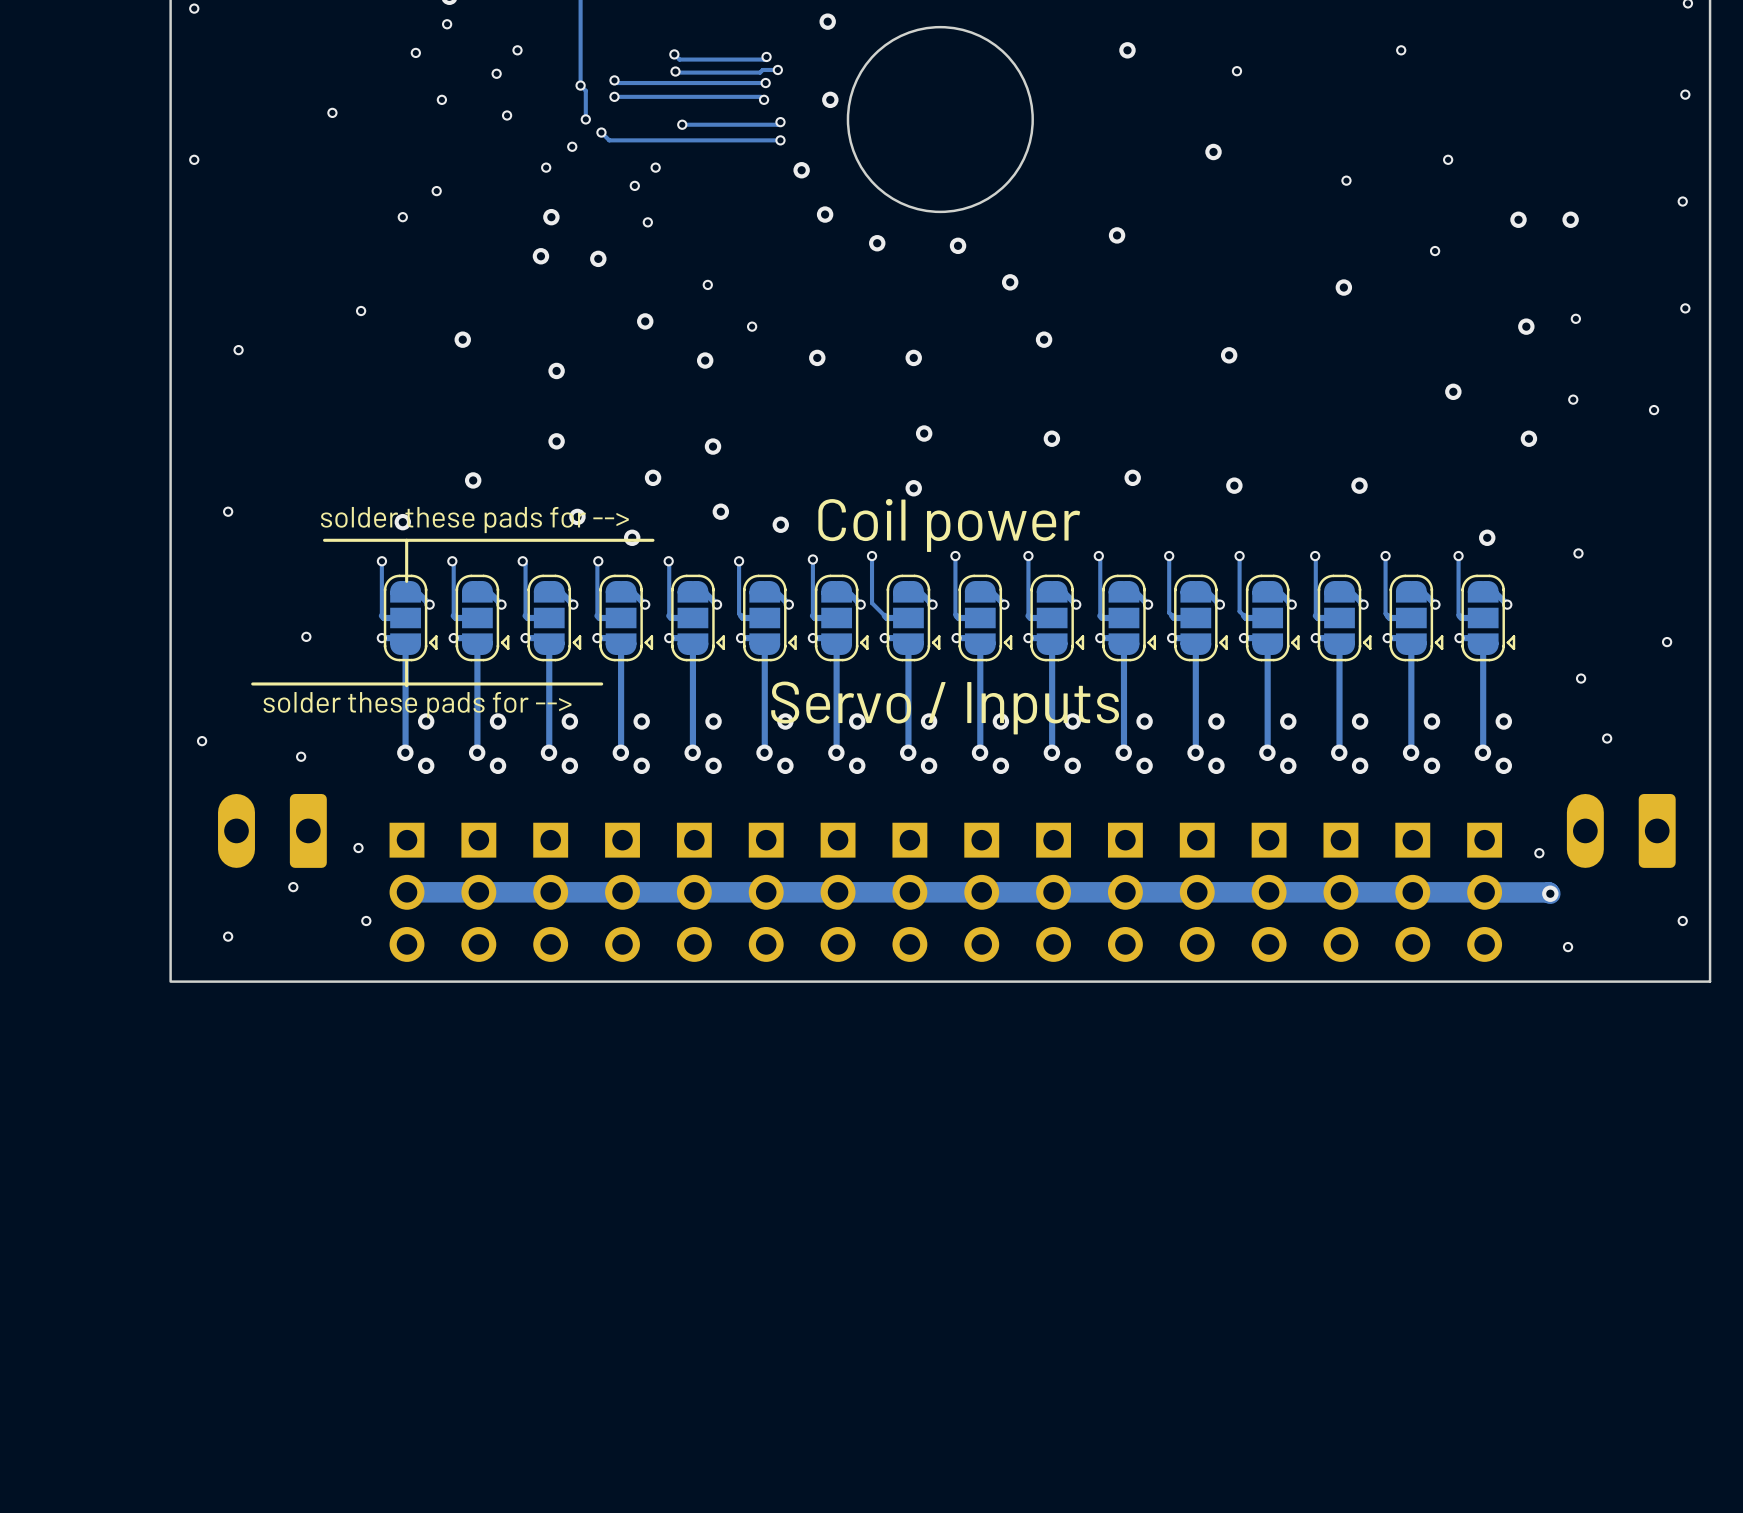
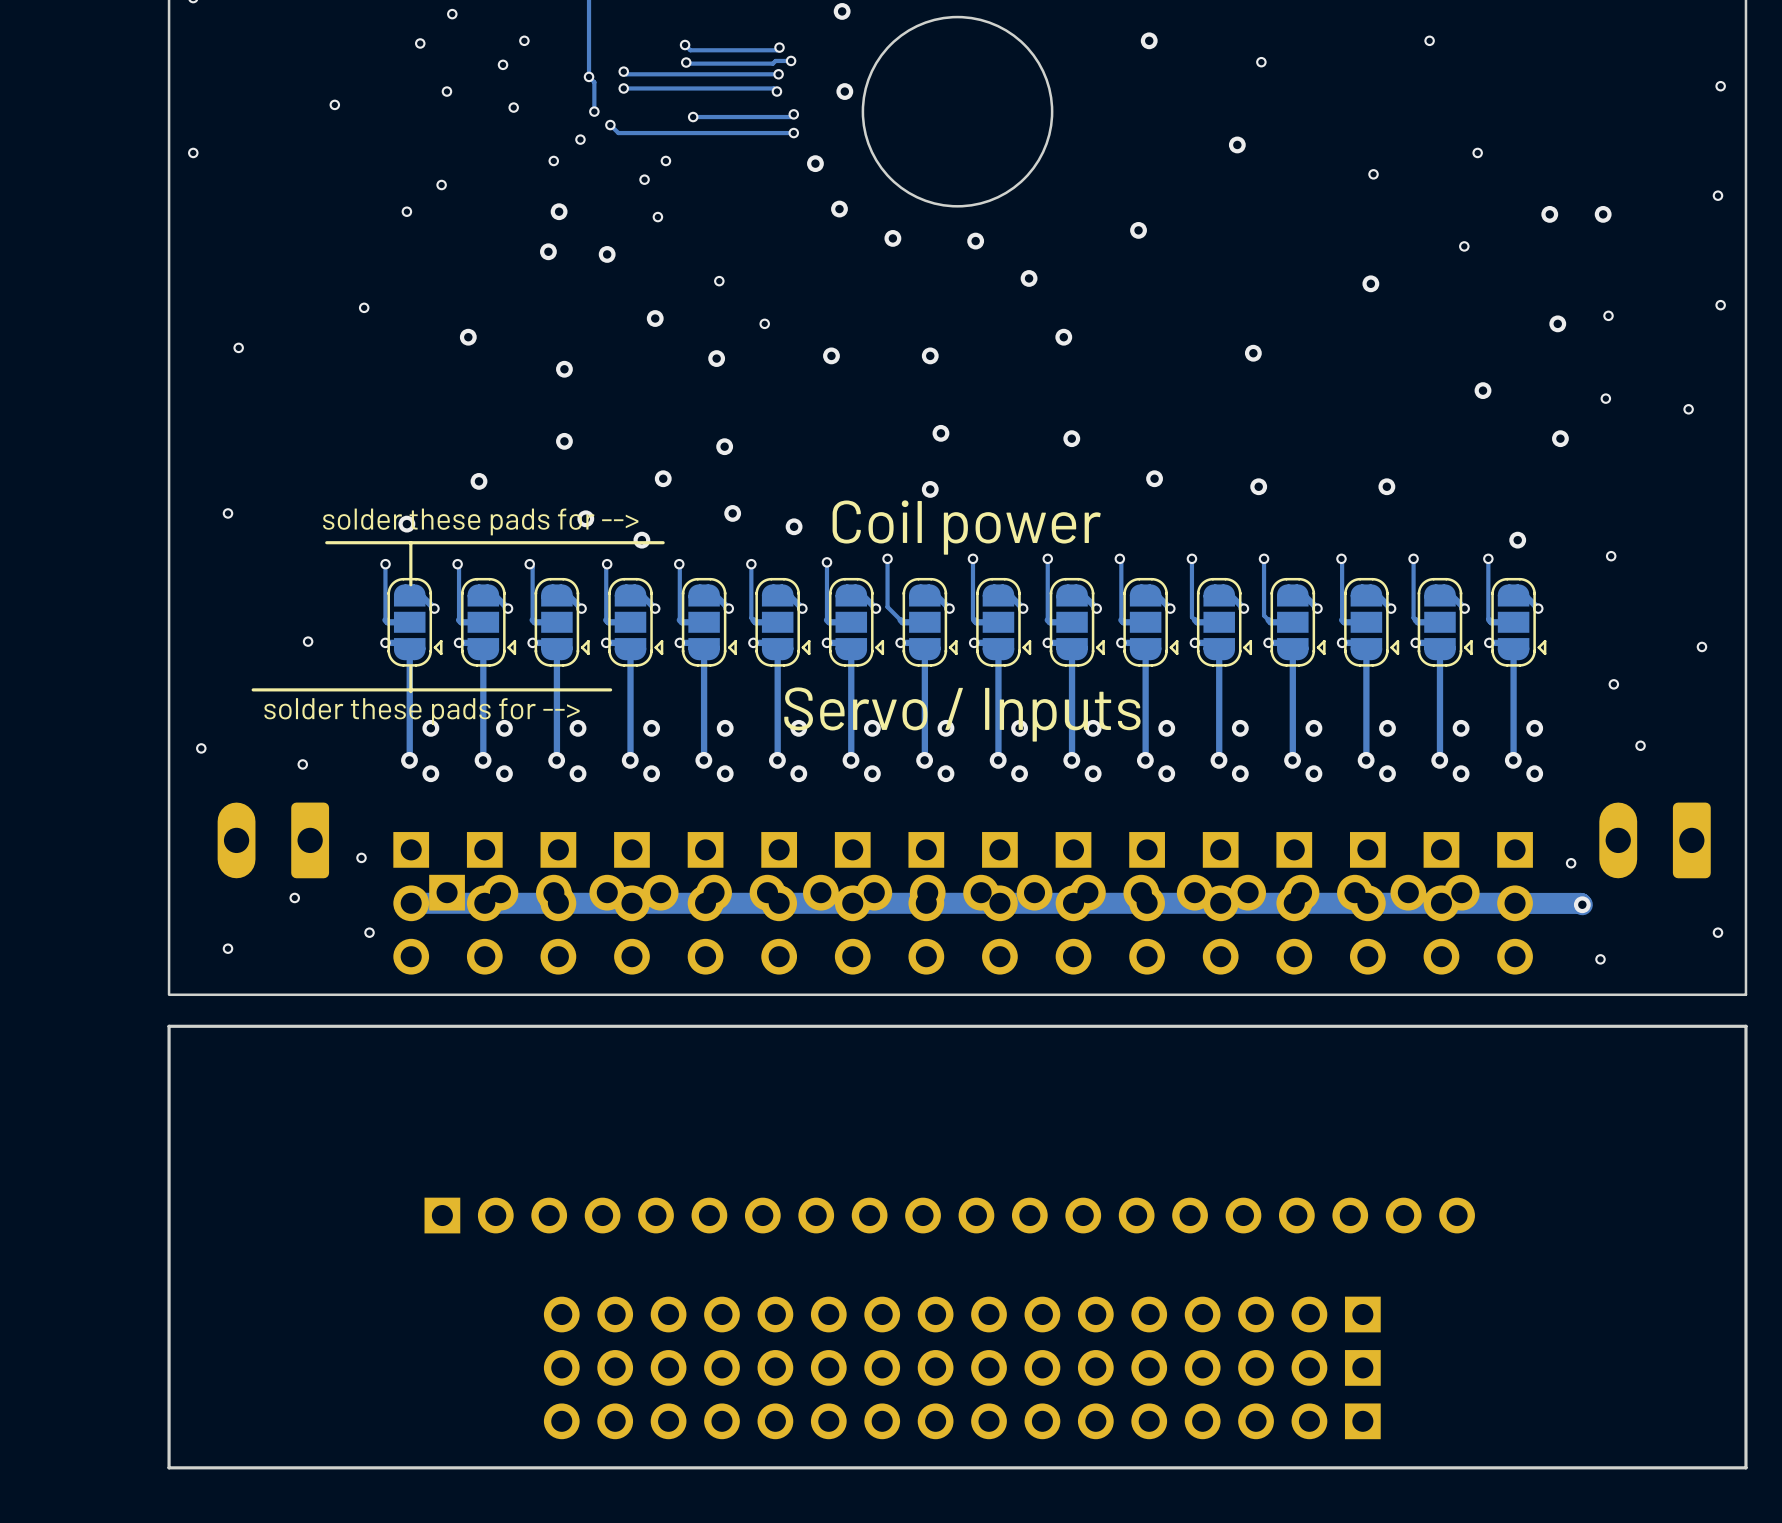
part: none -> (954, 892)
board edge: none -> (1745, 1026) (169, 1026) (169, 1467) (1745, 1467) (1745, 1026)
part: none -> (949, 1215)
part: none -> (962, 1314)
part: none -> (962, 1367)
part: none -> (962, 1421)

